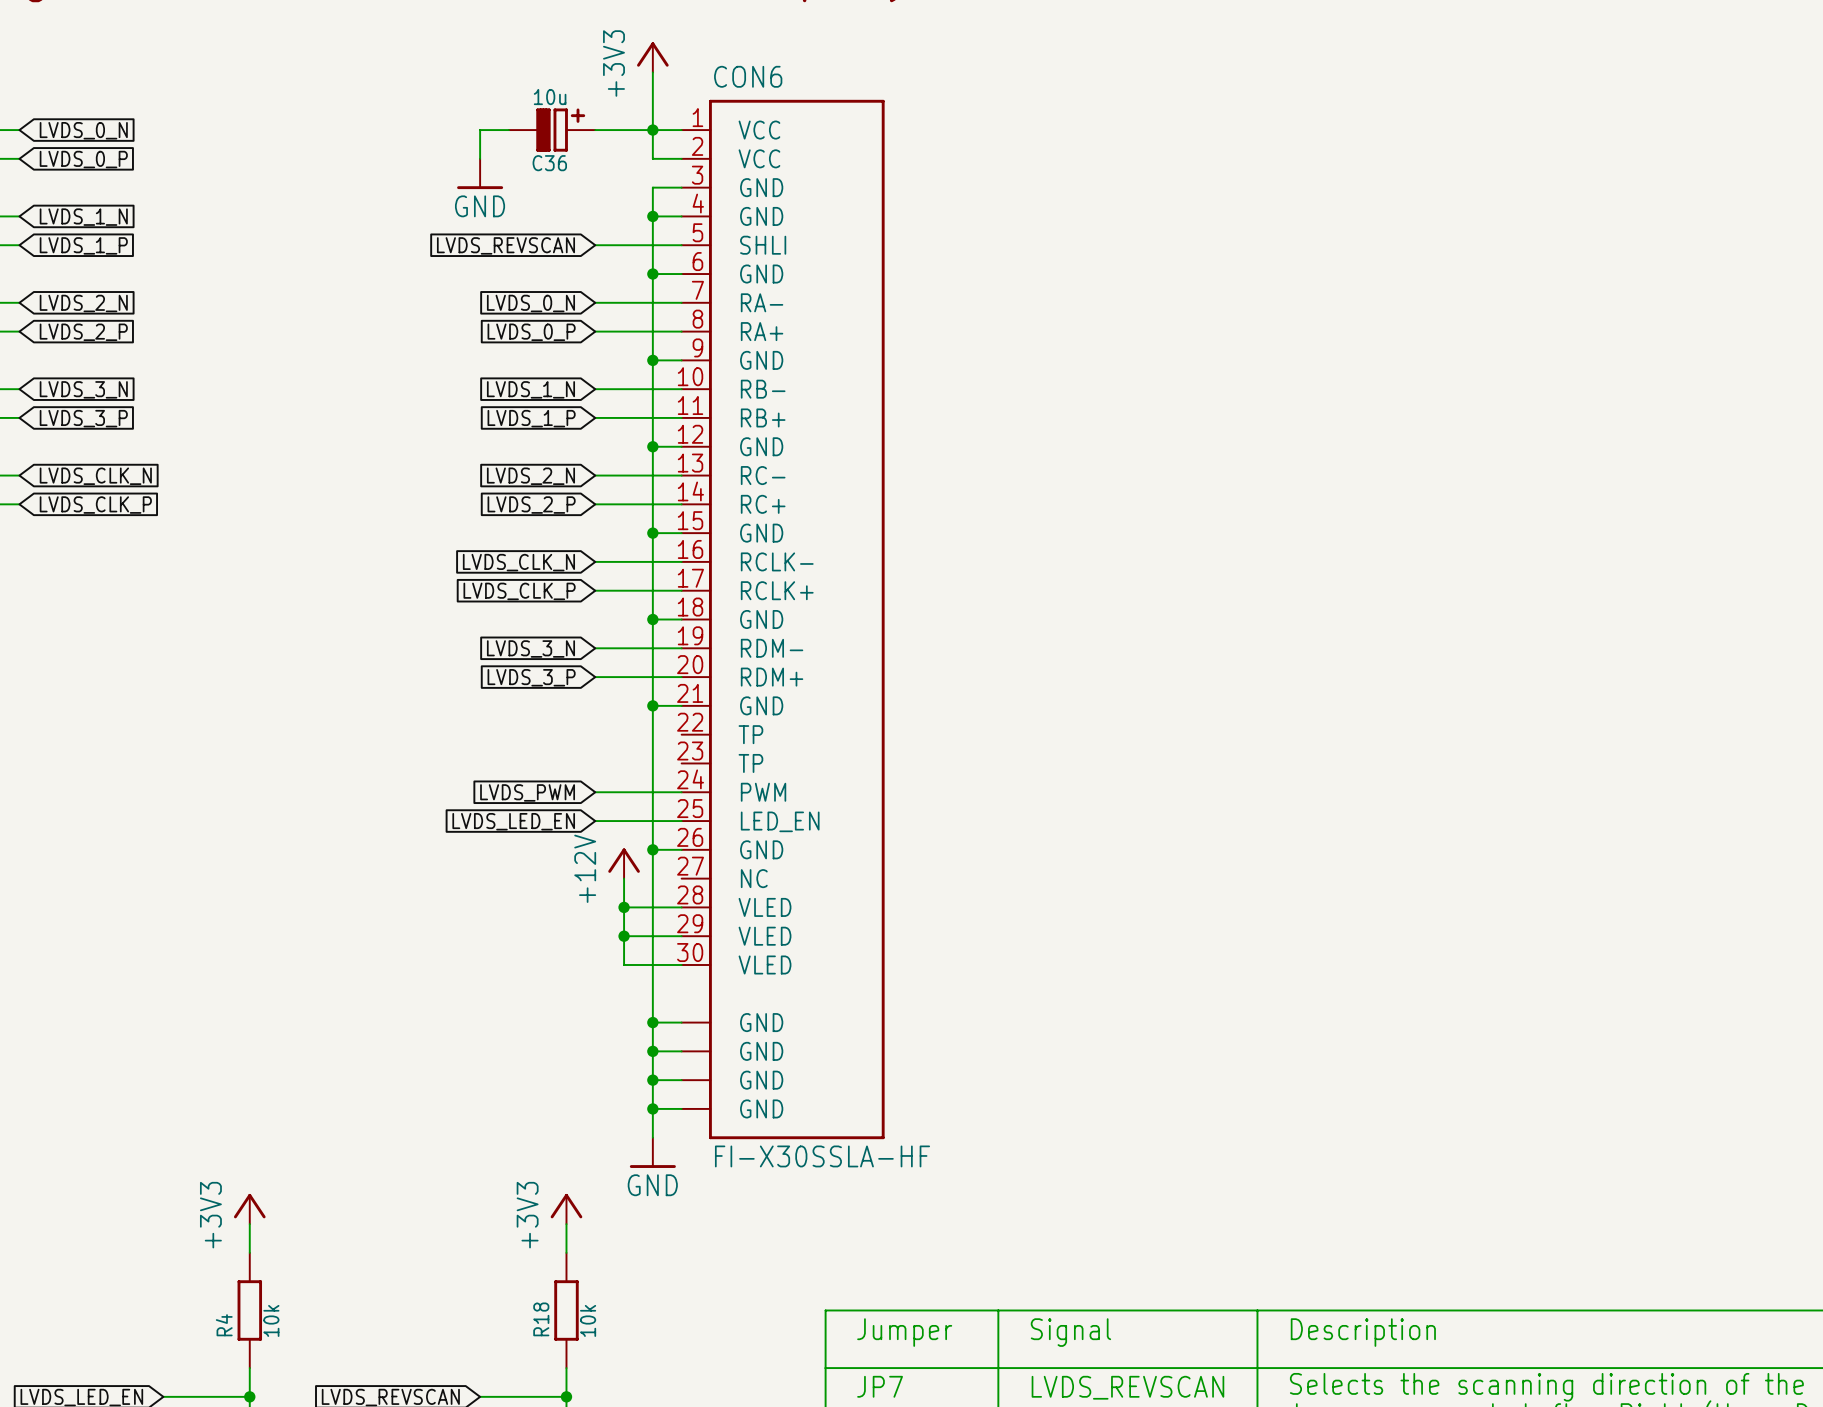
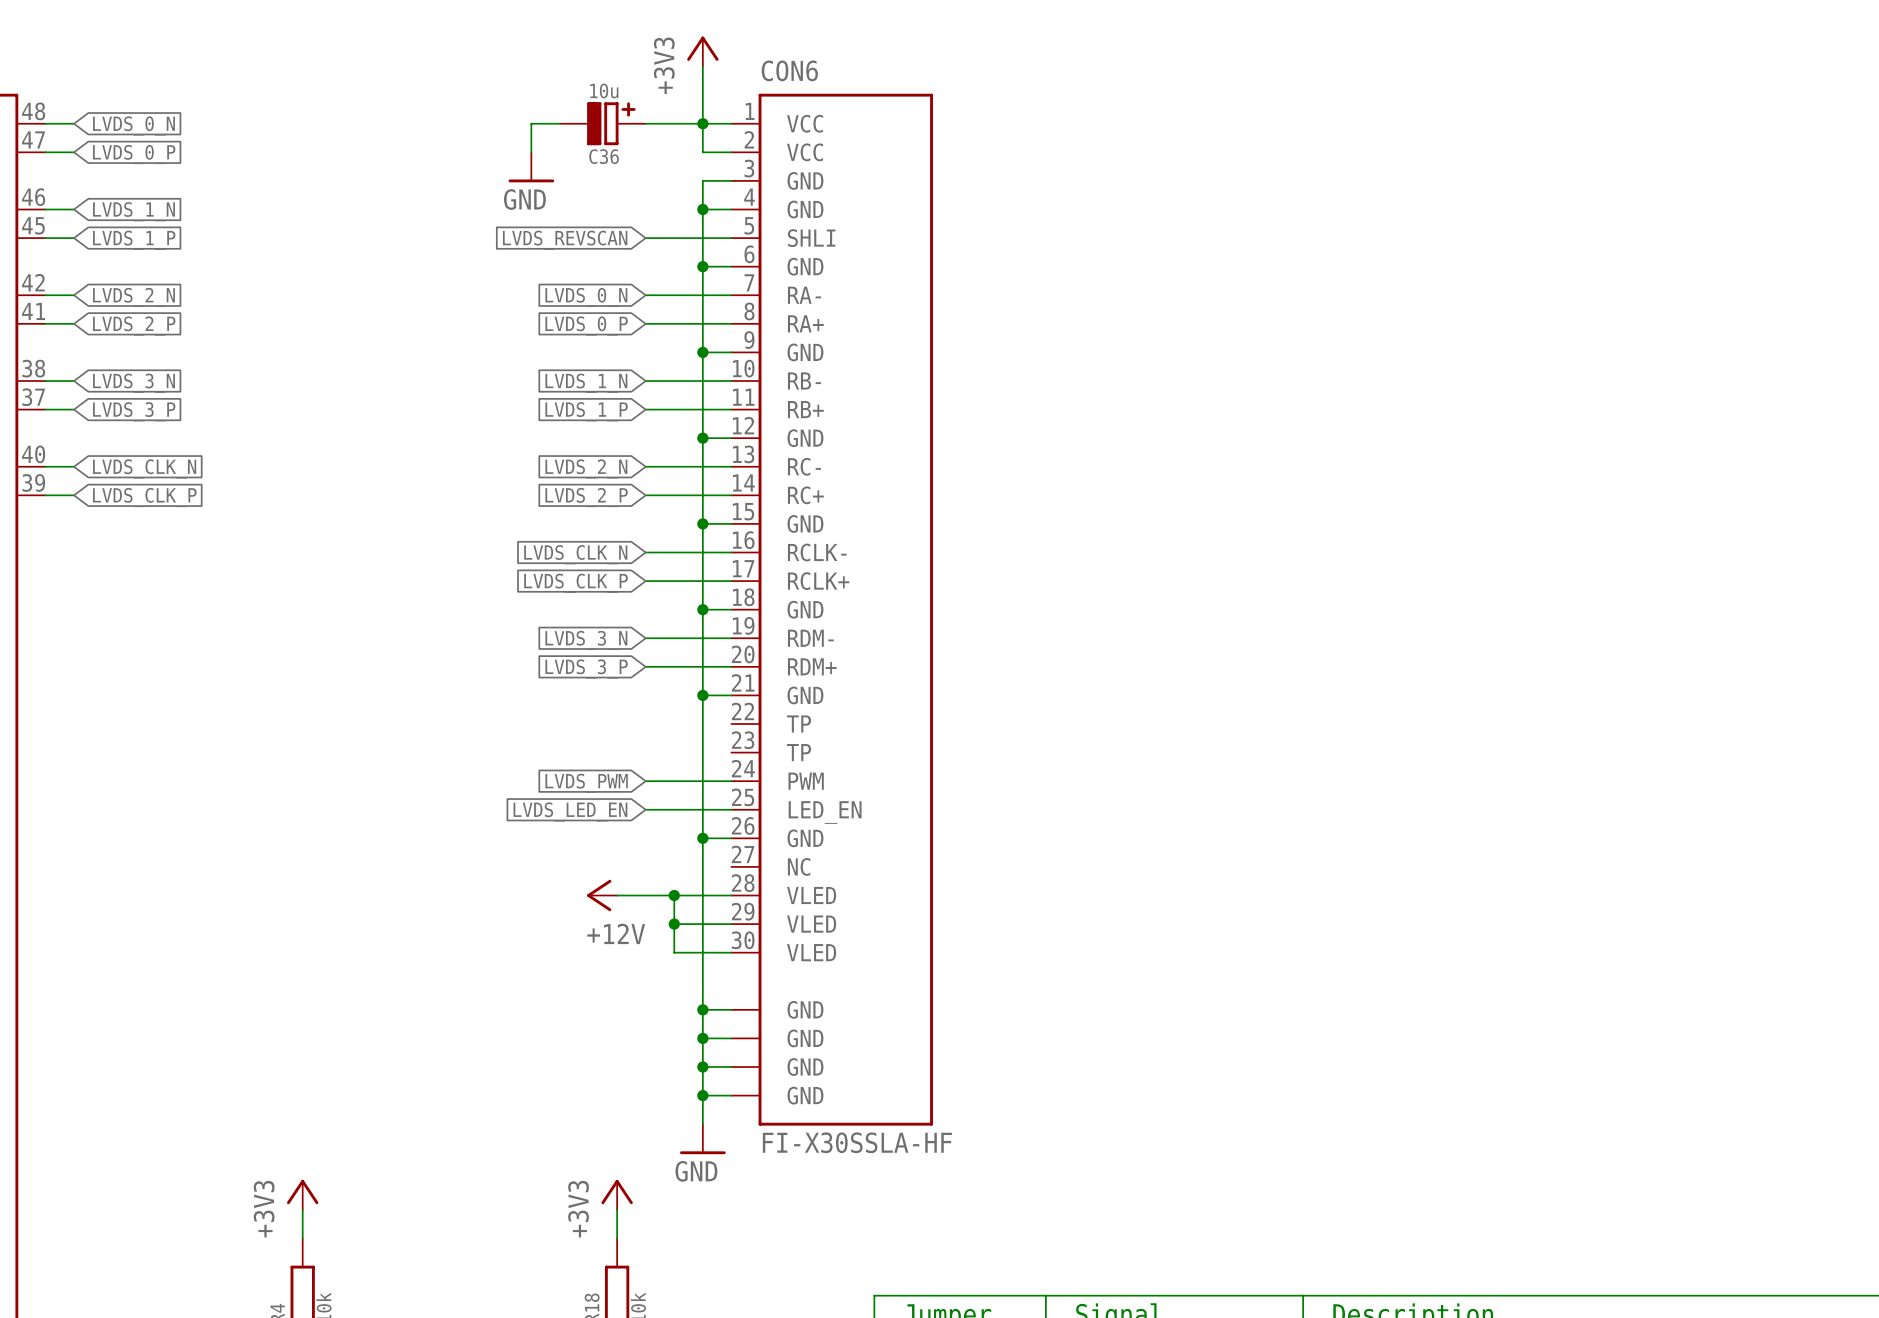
power symbol rotation: 0° (624, 860) -> 90° counterclockwise (599, 895)
power symbol position: +12V (624, 863) -> +12V (602, 895)
wire: (624, 878) (624, 907) -> (617, 895) (674, 895)

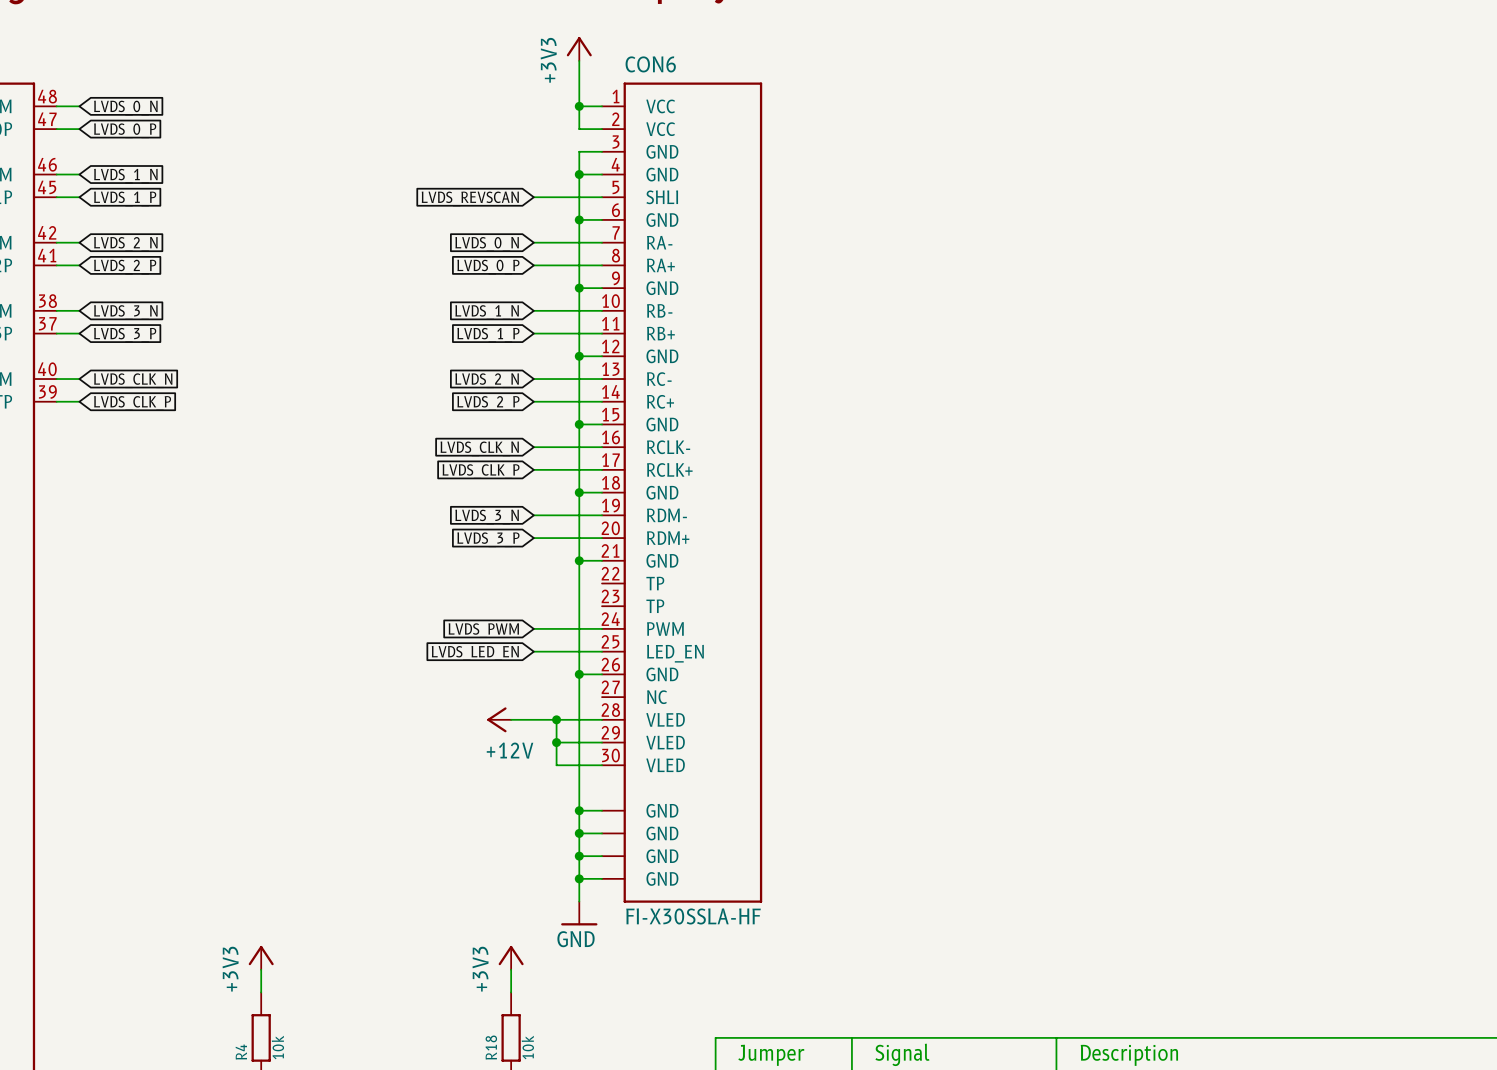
wire: (559, 123) (531, 123) (531, 152) -> none
C36: 10u (602, 123) -> none
wire: (645, 123) (702, 123) -> none
power symbol: GND (531, 167) -> none

